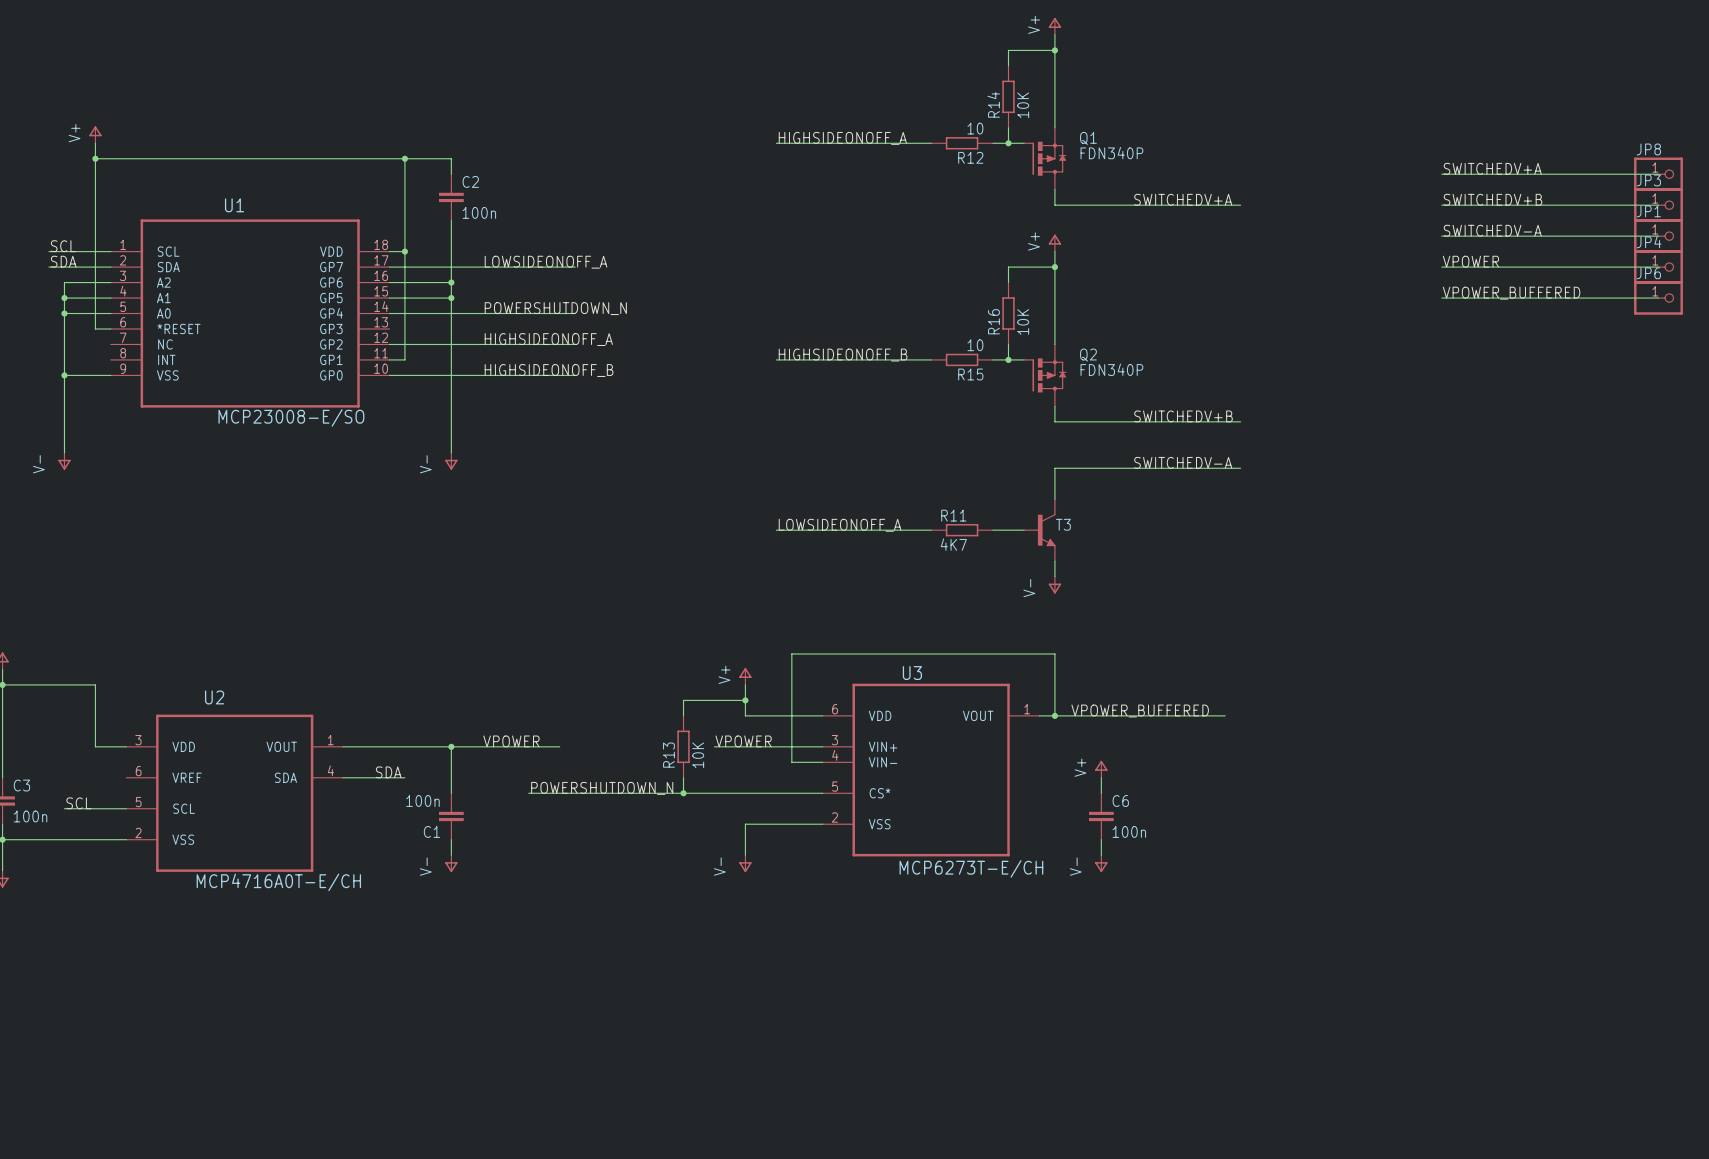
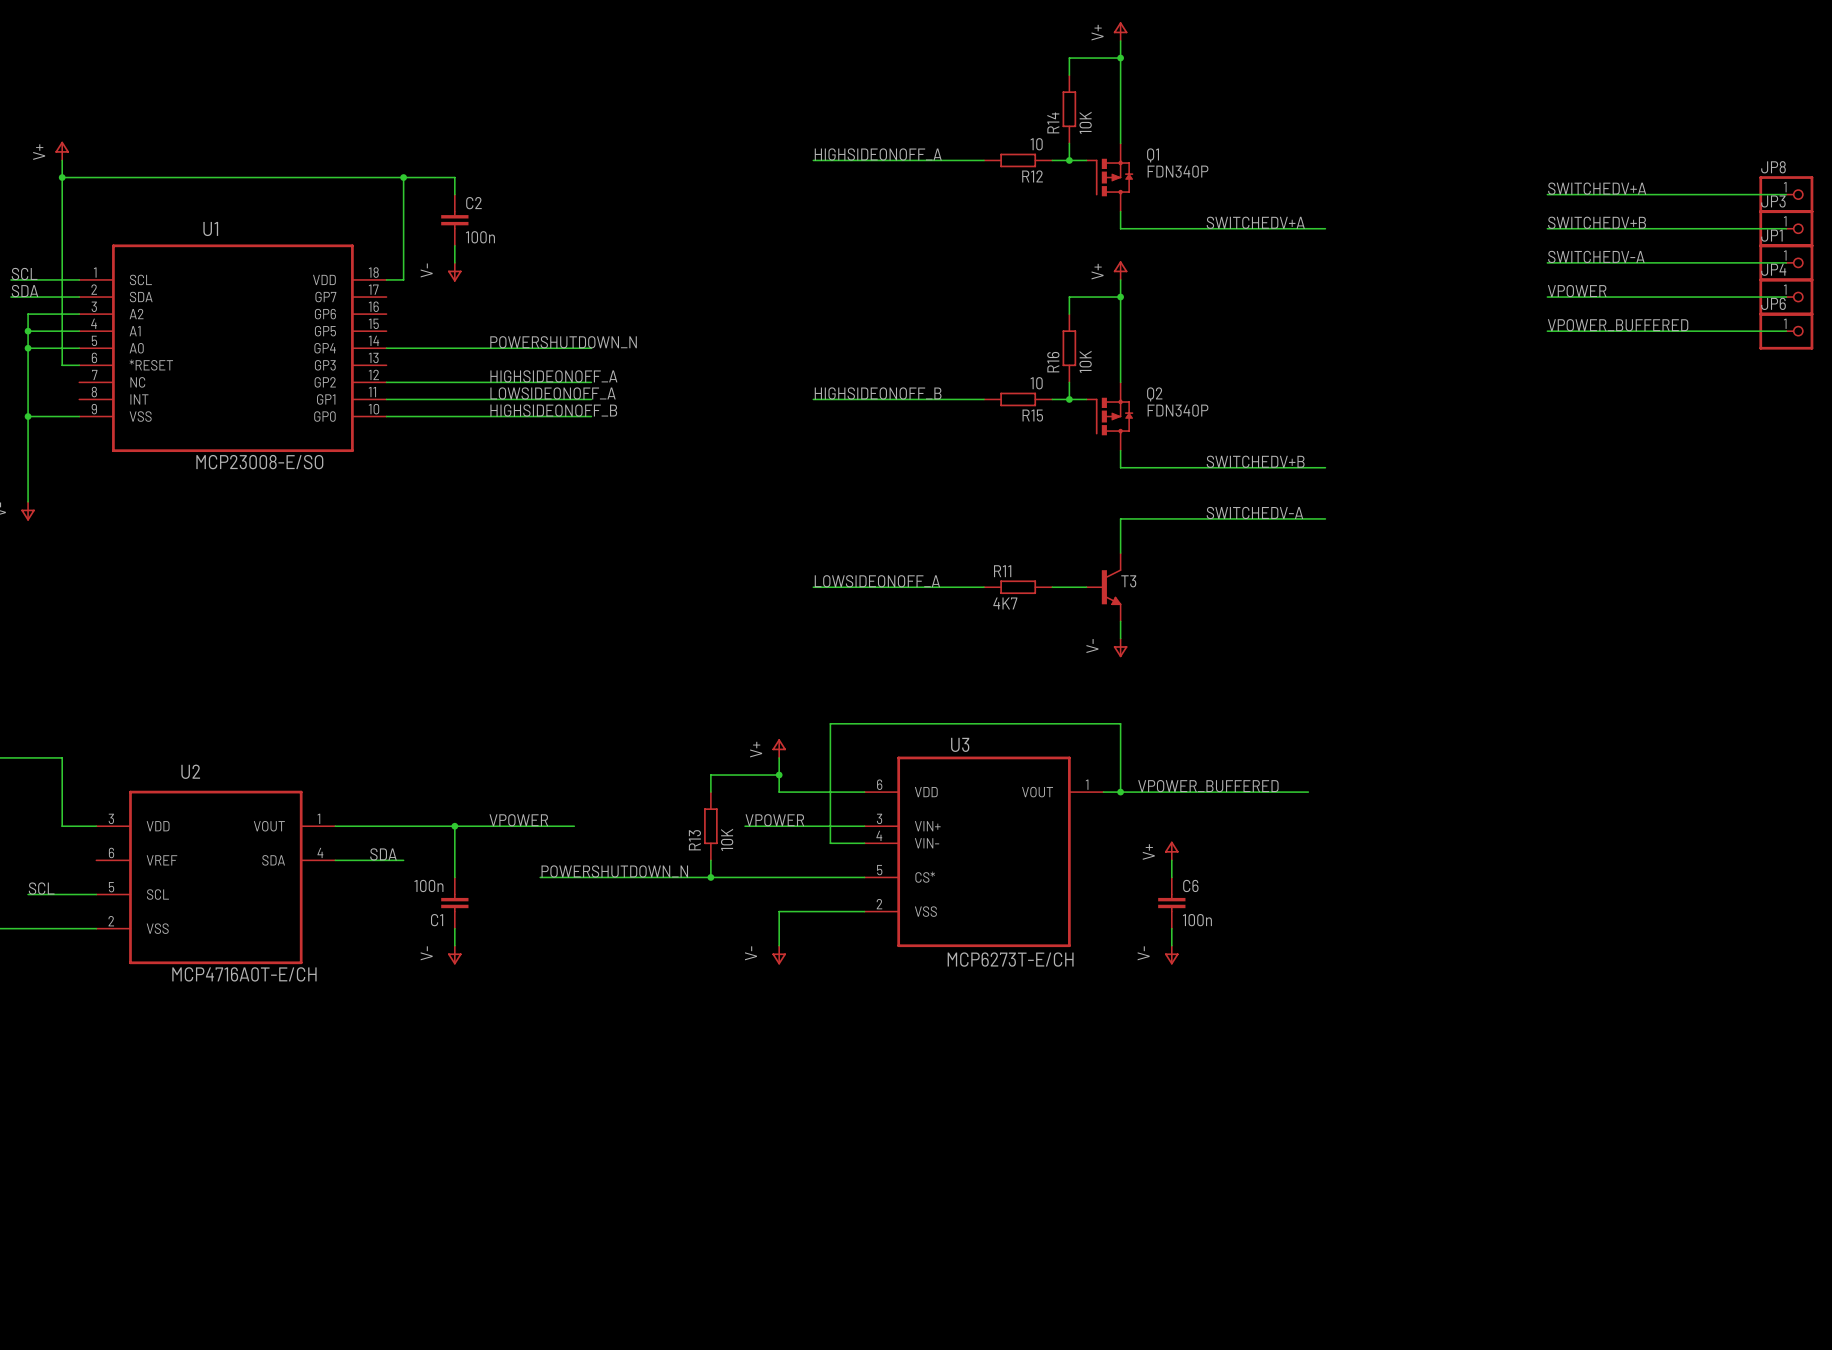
wire: (451, 236) (451, 452) -> none
power symbol: none -> V- (454, 272)
wire: (404, 251) (404, 359) -> (591, 399) (403, 399)
junction: (404, 251) -> none
label position: LOWSIDEONOFF_A (546, 262) -> LOWSIDEONOFF_A (553, 393)
wire: (389, 267) (575, 267) -> none
wire: (389, 282) (451, 282) -> none
junction: (451, 282) -> none
wire: (389, 298) (451, 298) -> none
junction: (451, 298) -> none
power symbol: V- (451, 461) -> none

